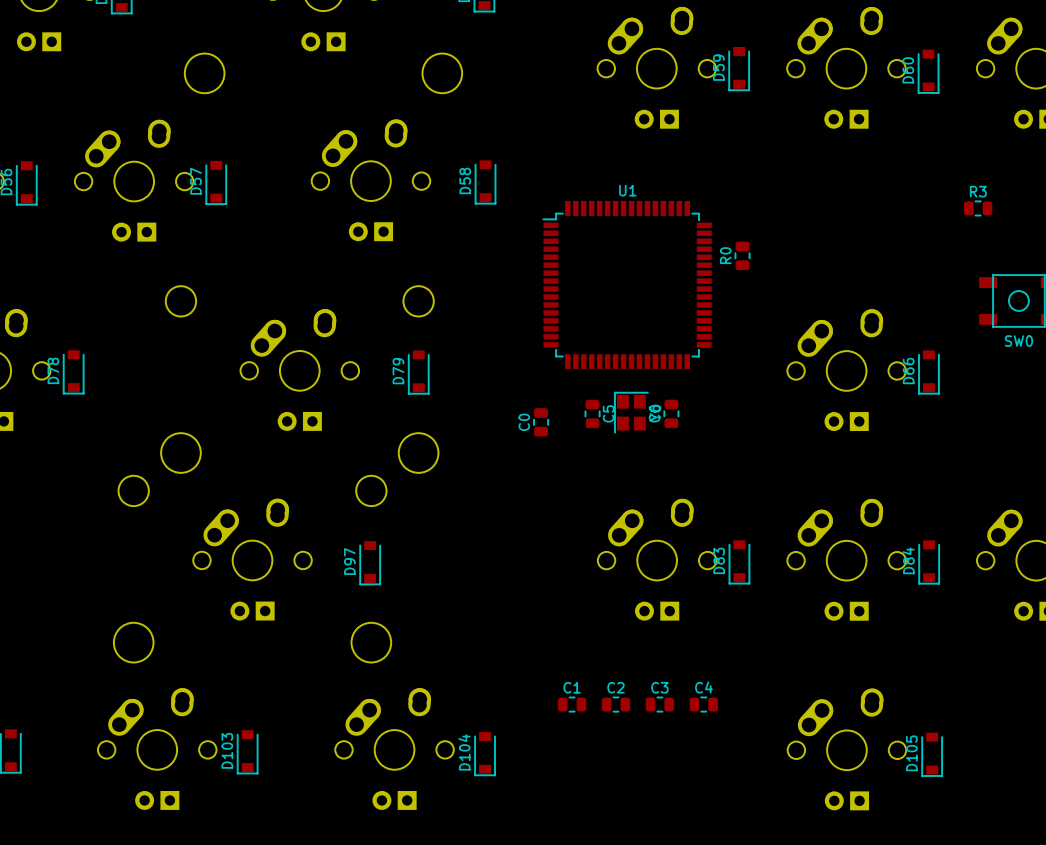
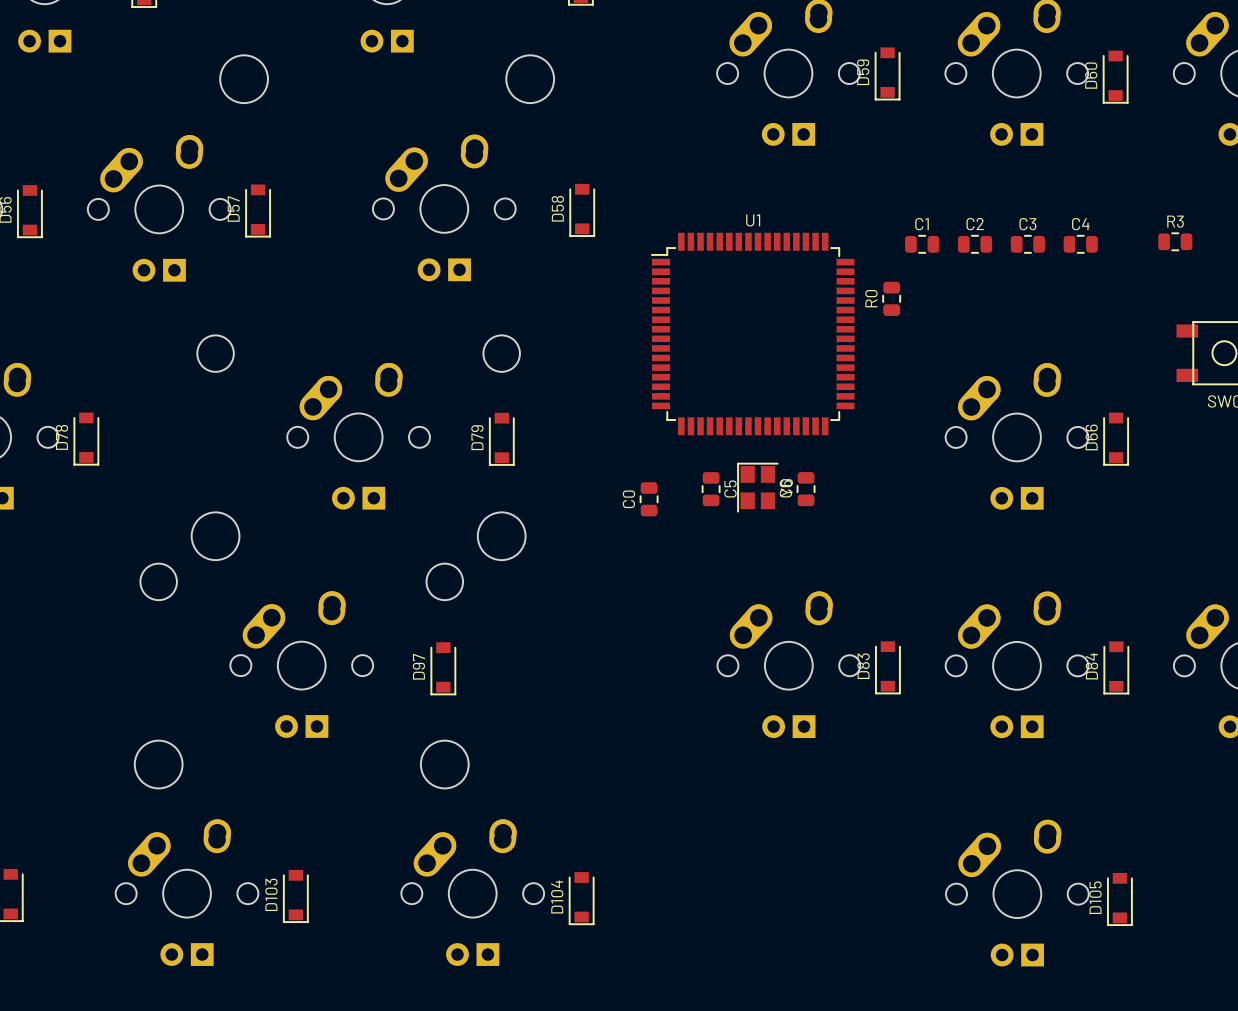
C1 position: (572, 704) -> (922, 244)
C2 position: (615, 704) -> (975, 244)
C3 position: (659, 704) -> (1027, 244)
C4 position: (703, 704) -> (1080, 244)

